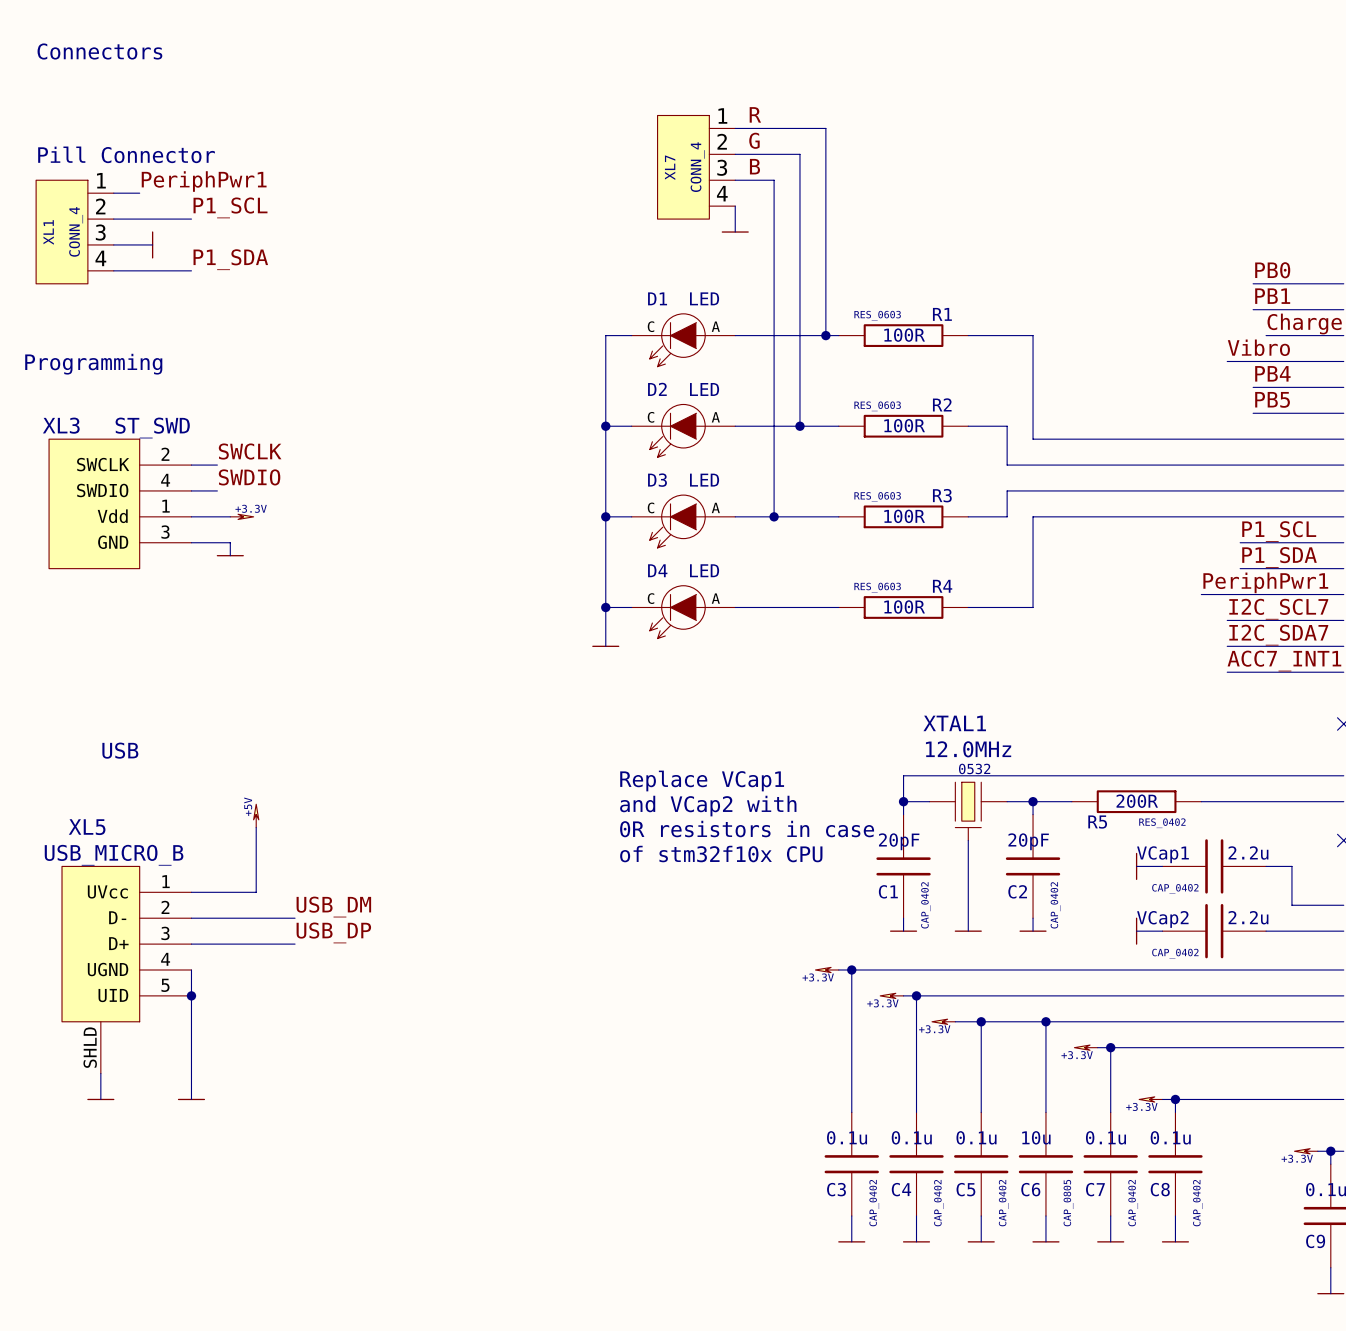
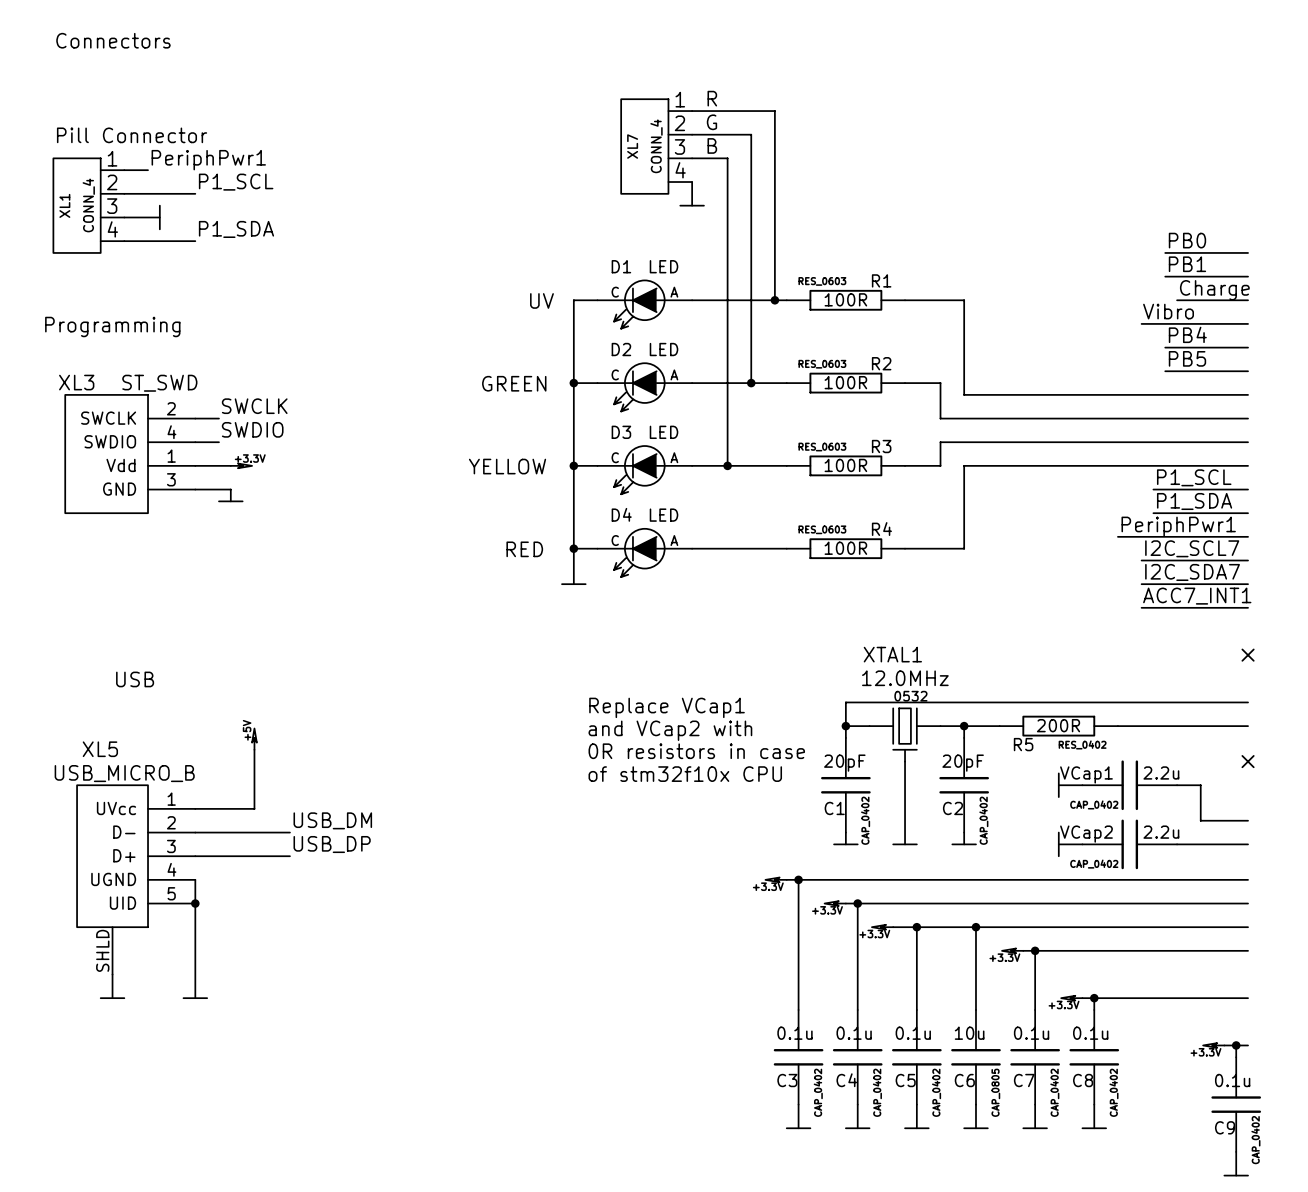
text: none -> UV (541, 300)
text: none -> GREEN (514, 383)
text: none -> YELLOW (507, 466)
text: none -> RED (524, 549)

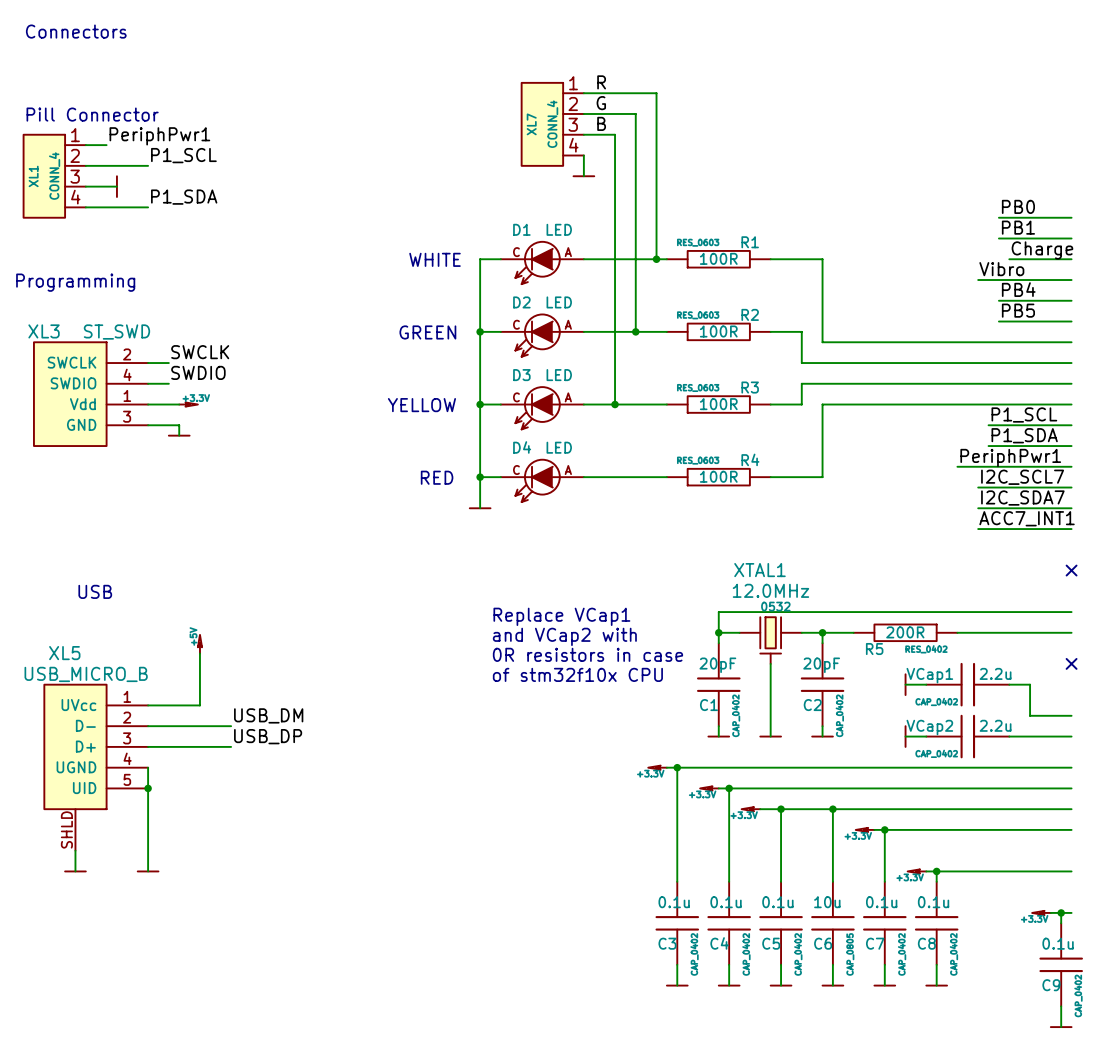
text: none -> WHITE (435, 259)
text: UV (541, 300) -> none

